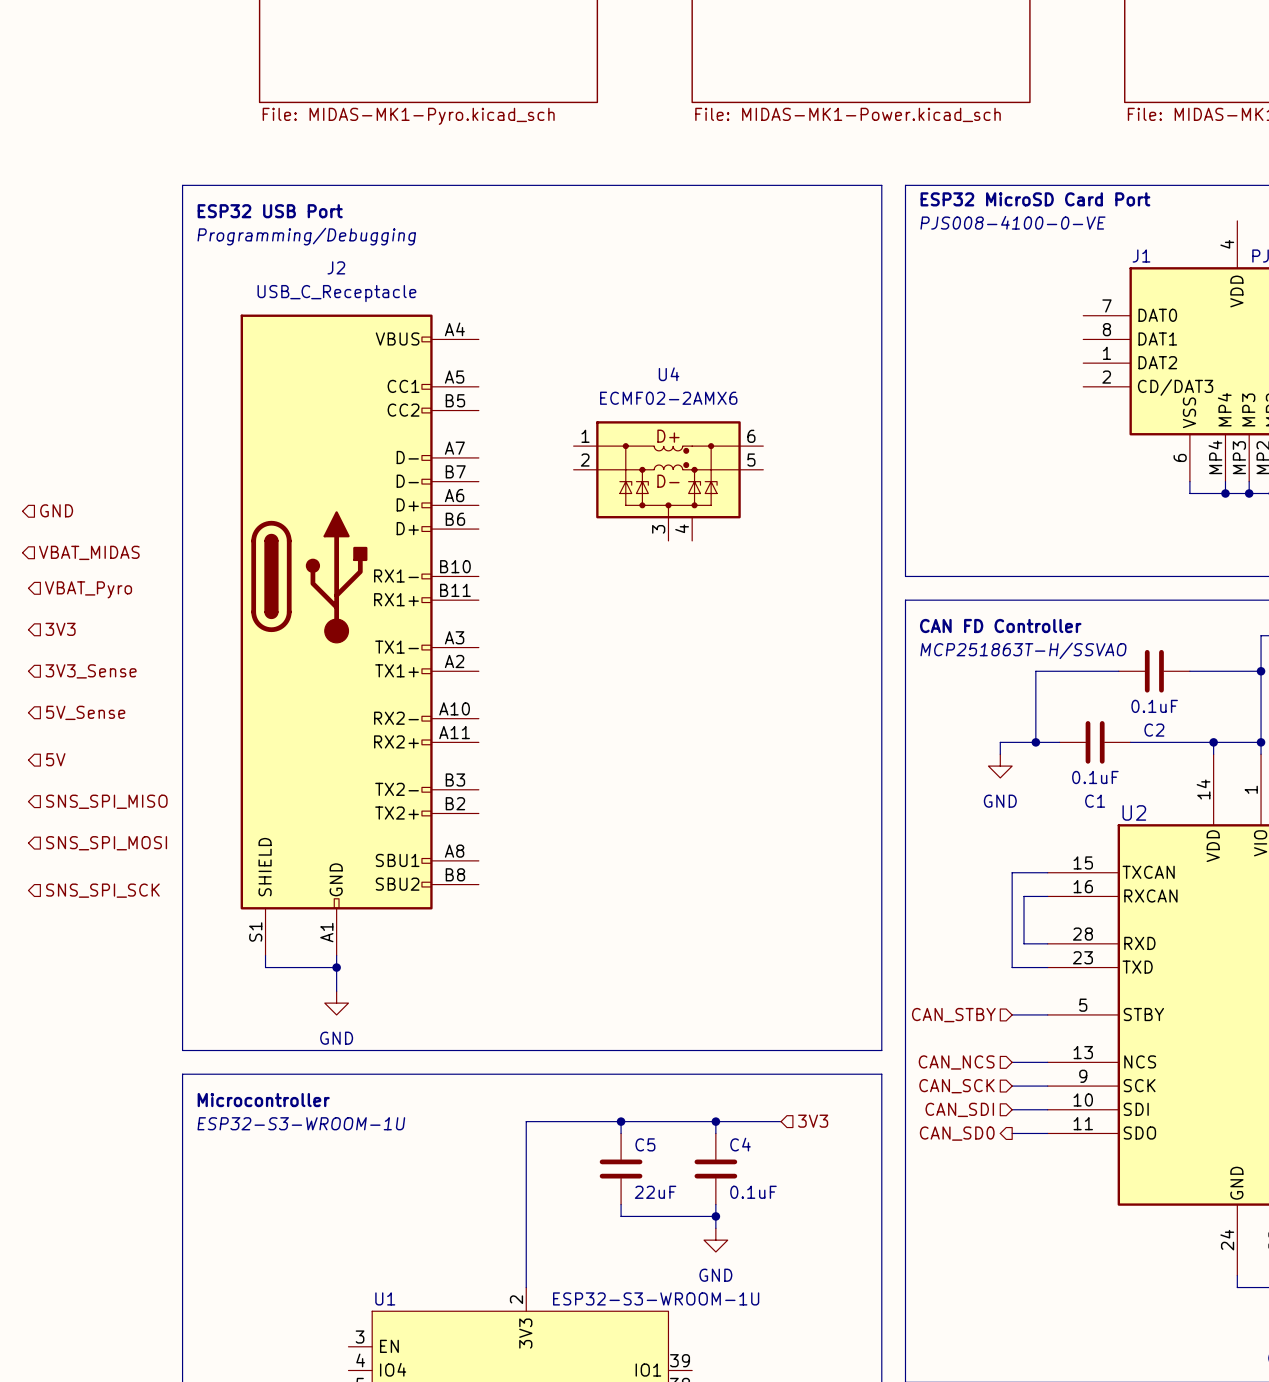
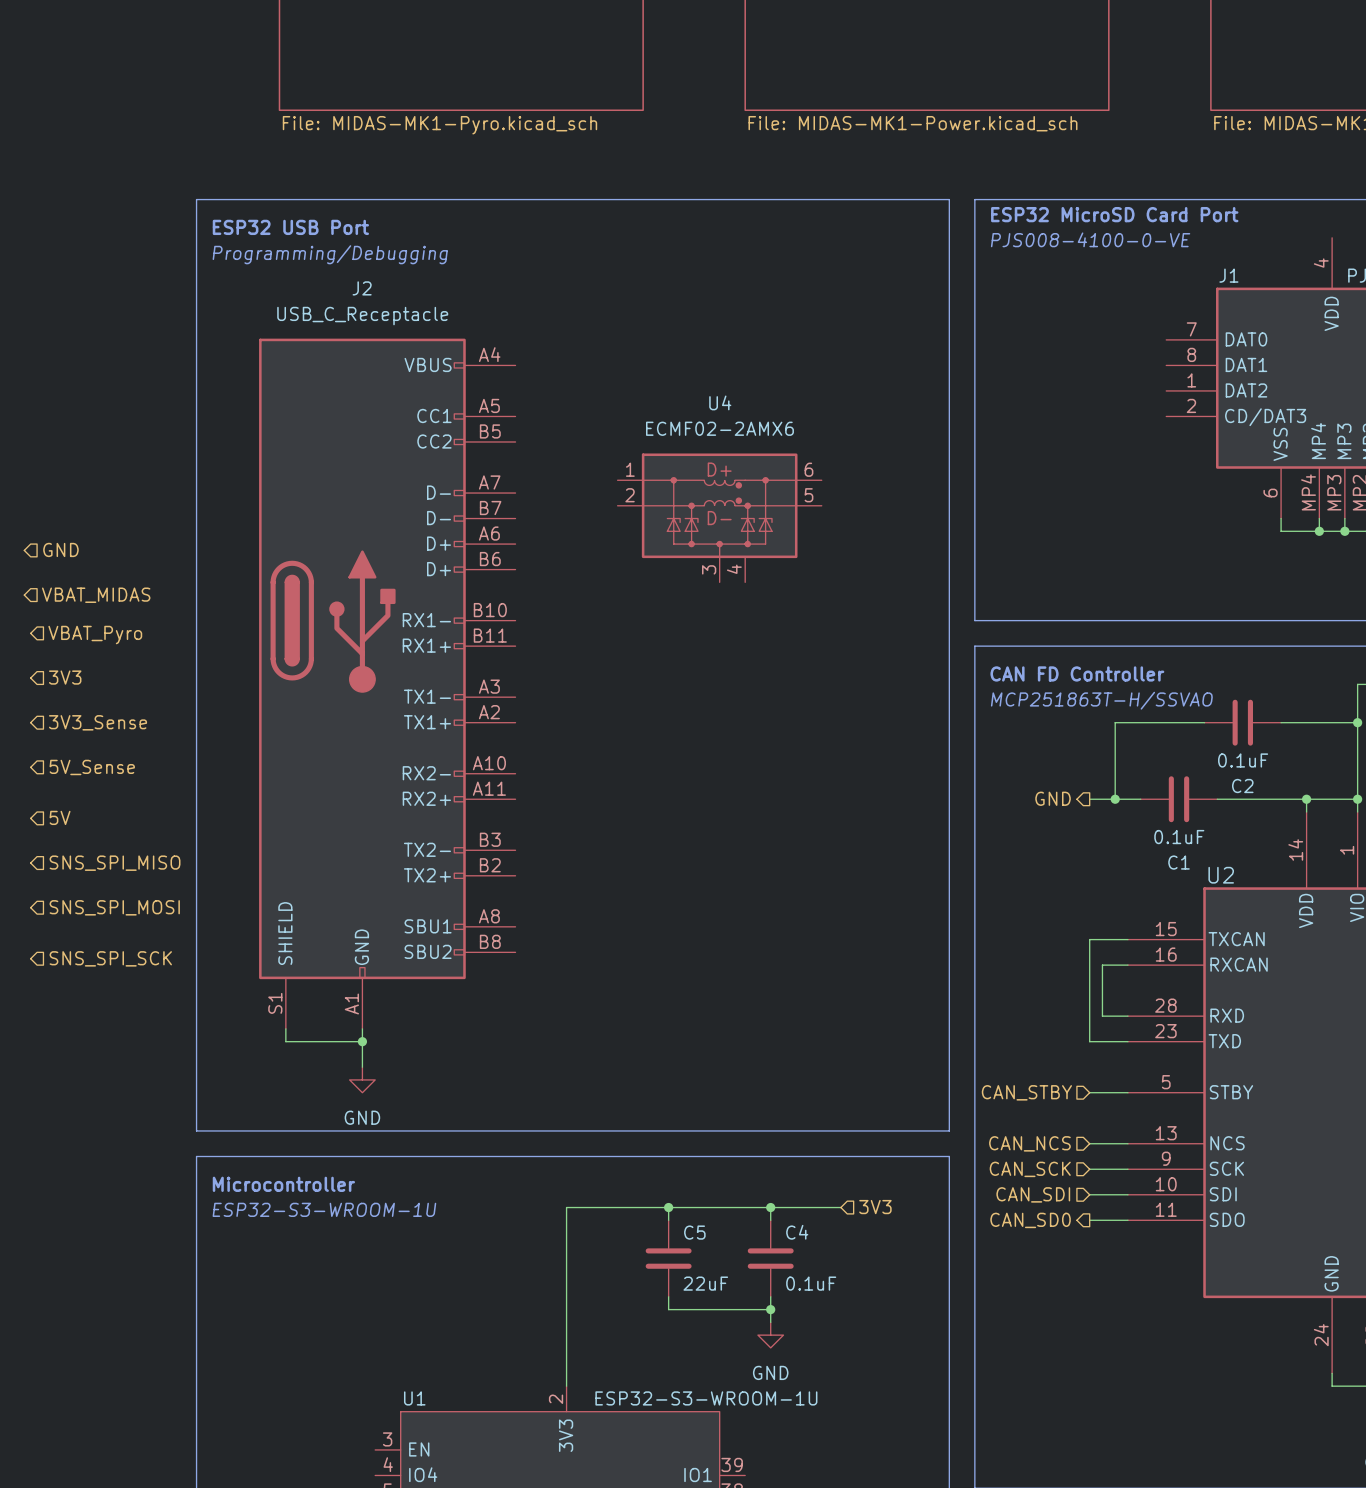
hierarchical label: none -> GND (1053, 798)
wire: (1012, 742) (1000, 742) (1000, 754) -> none
power symbol: GND (1000, 766) -> none

